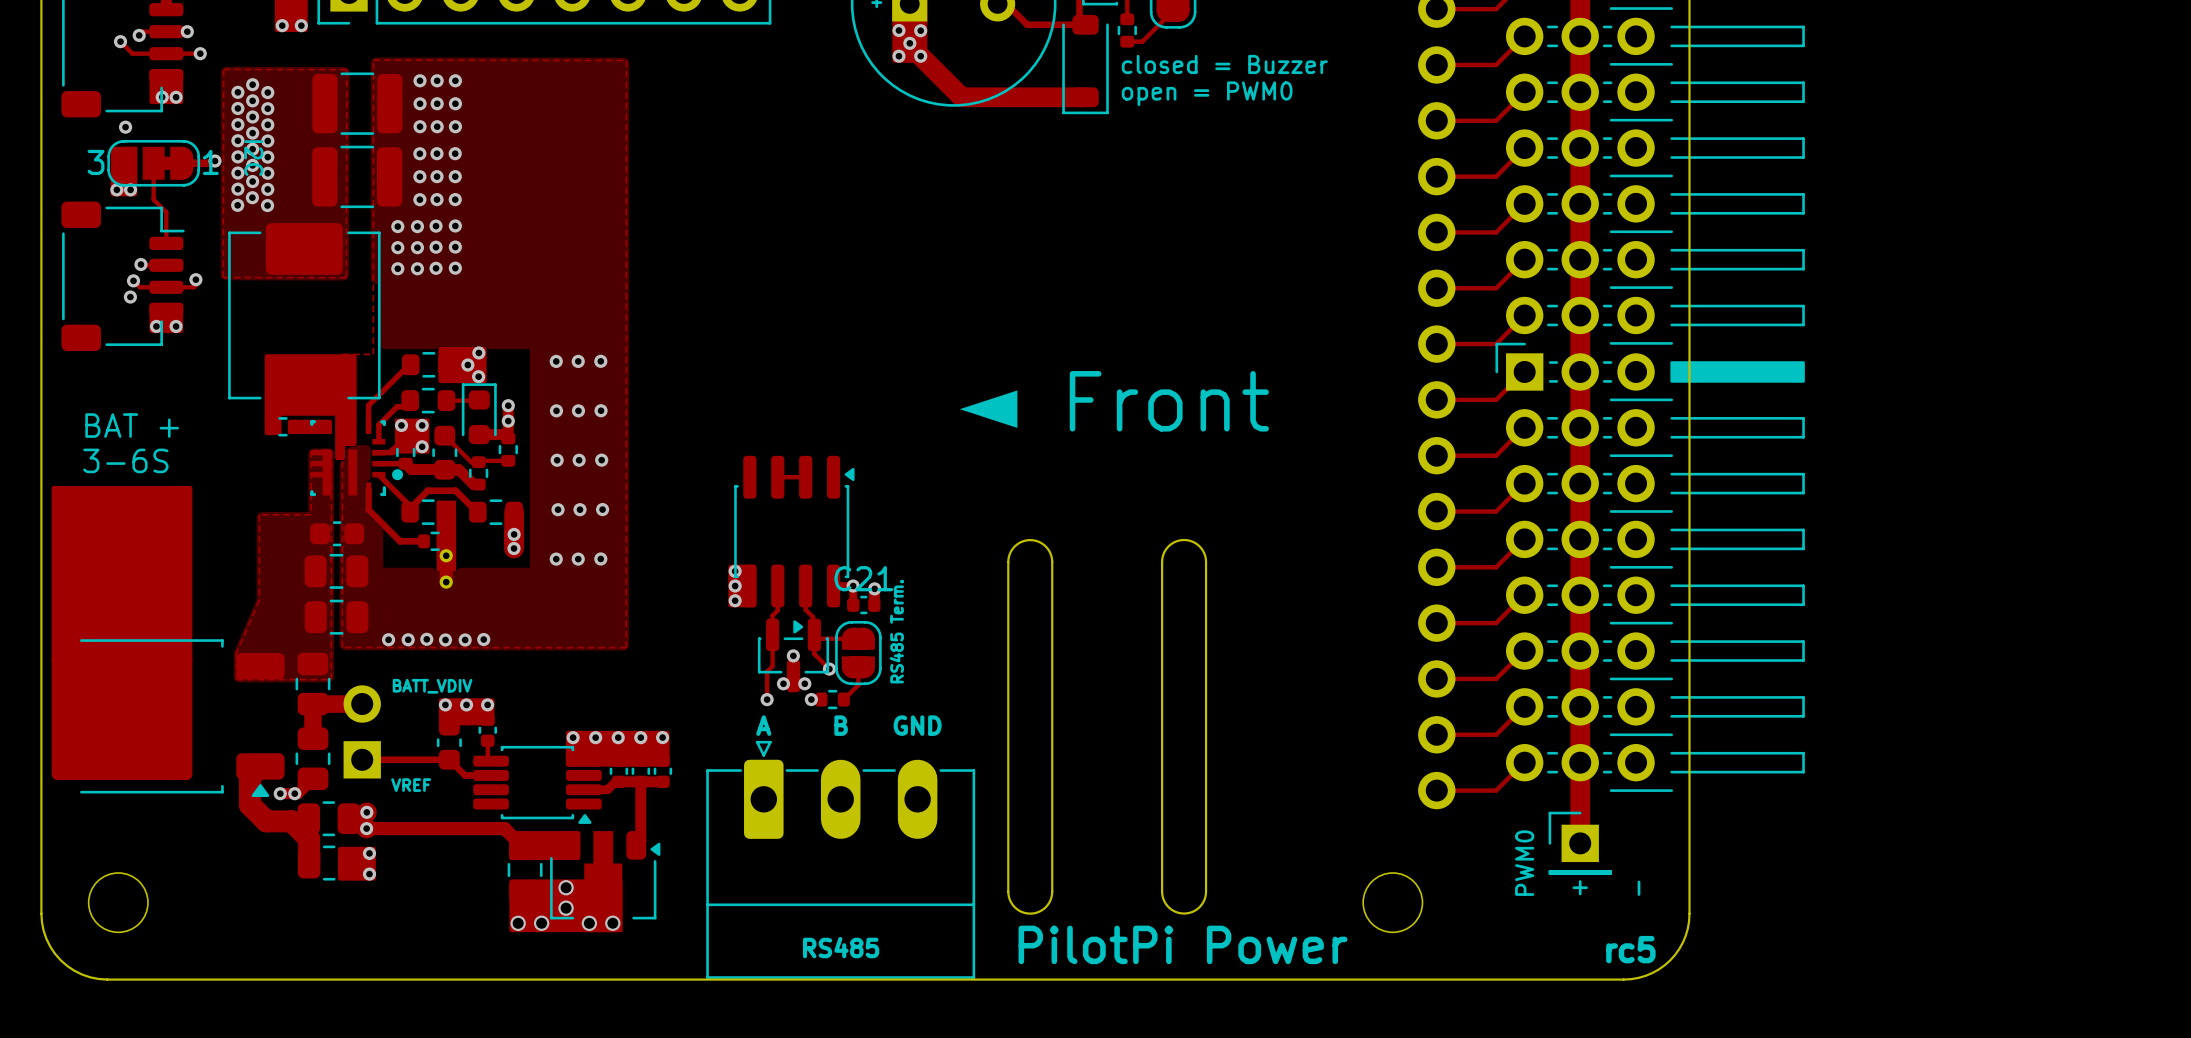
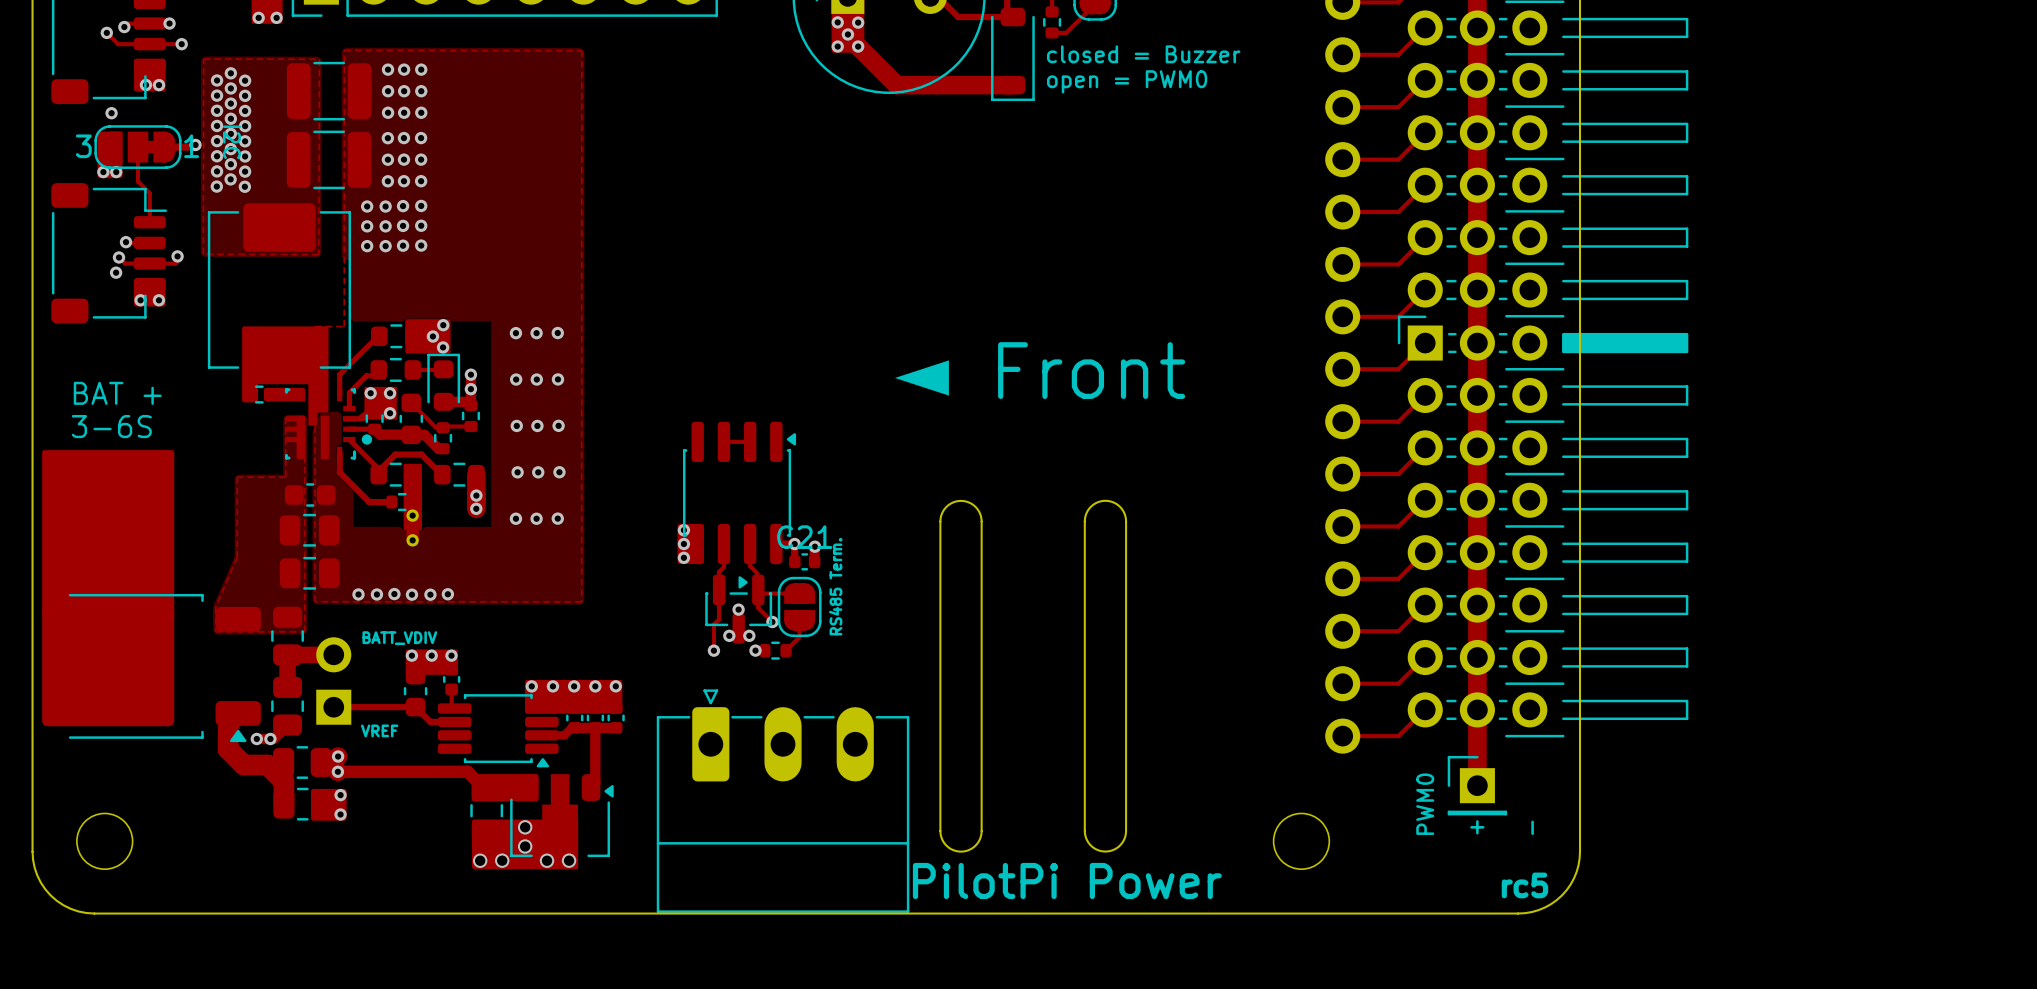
text: A (763, 725) -> none
text: B (841, 725) -> none
text: GND (917, 725) -> none
text position: PilotPi Power (1183, 944) -> PilotPi Power (1067, 881)
text: RS485 (841, 947) -> none

